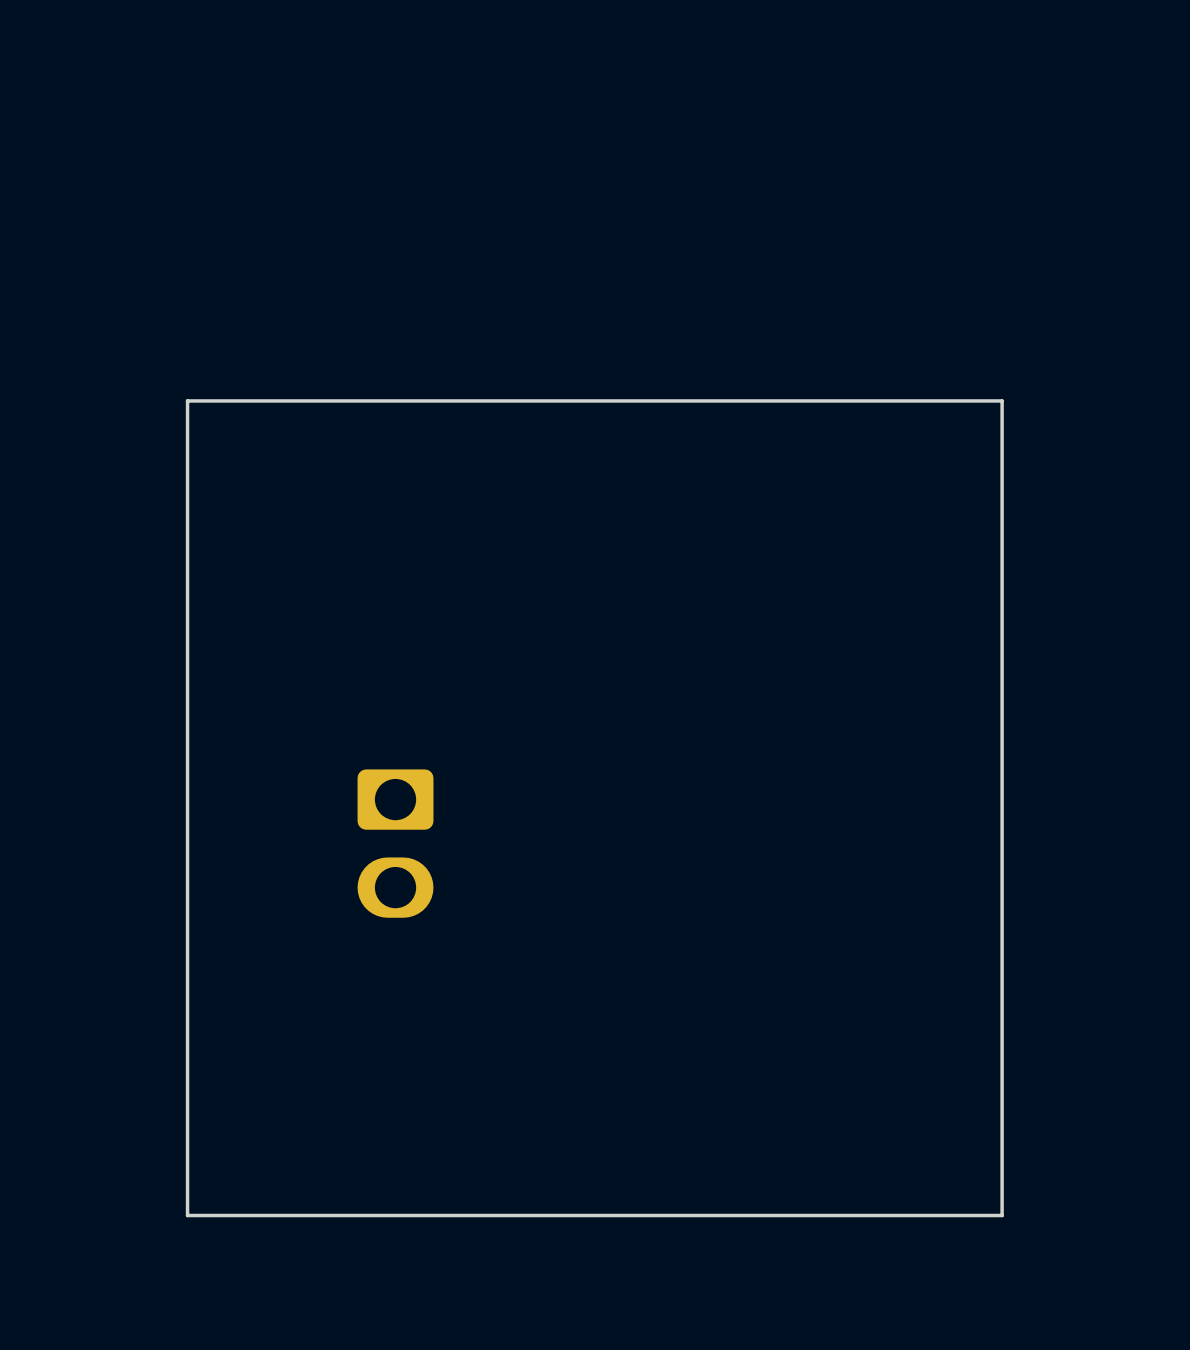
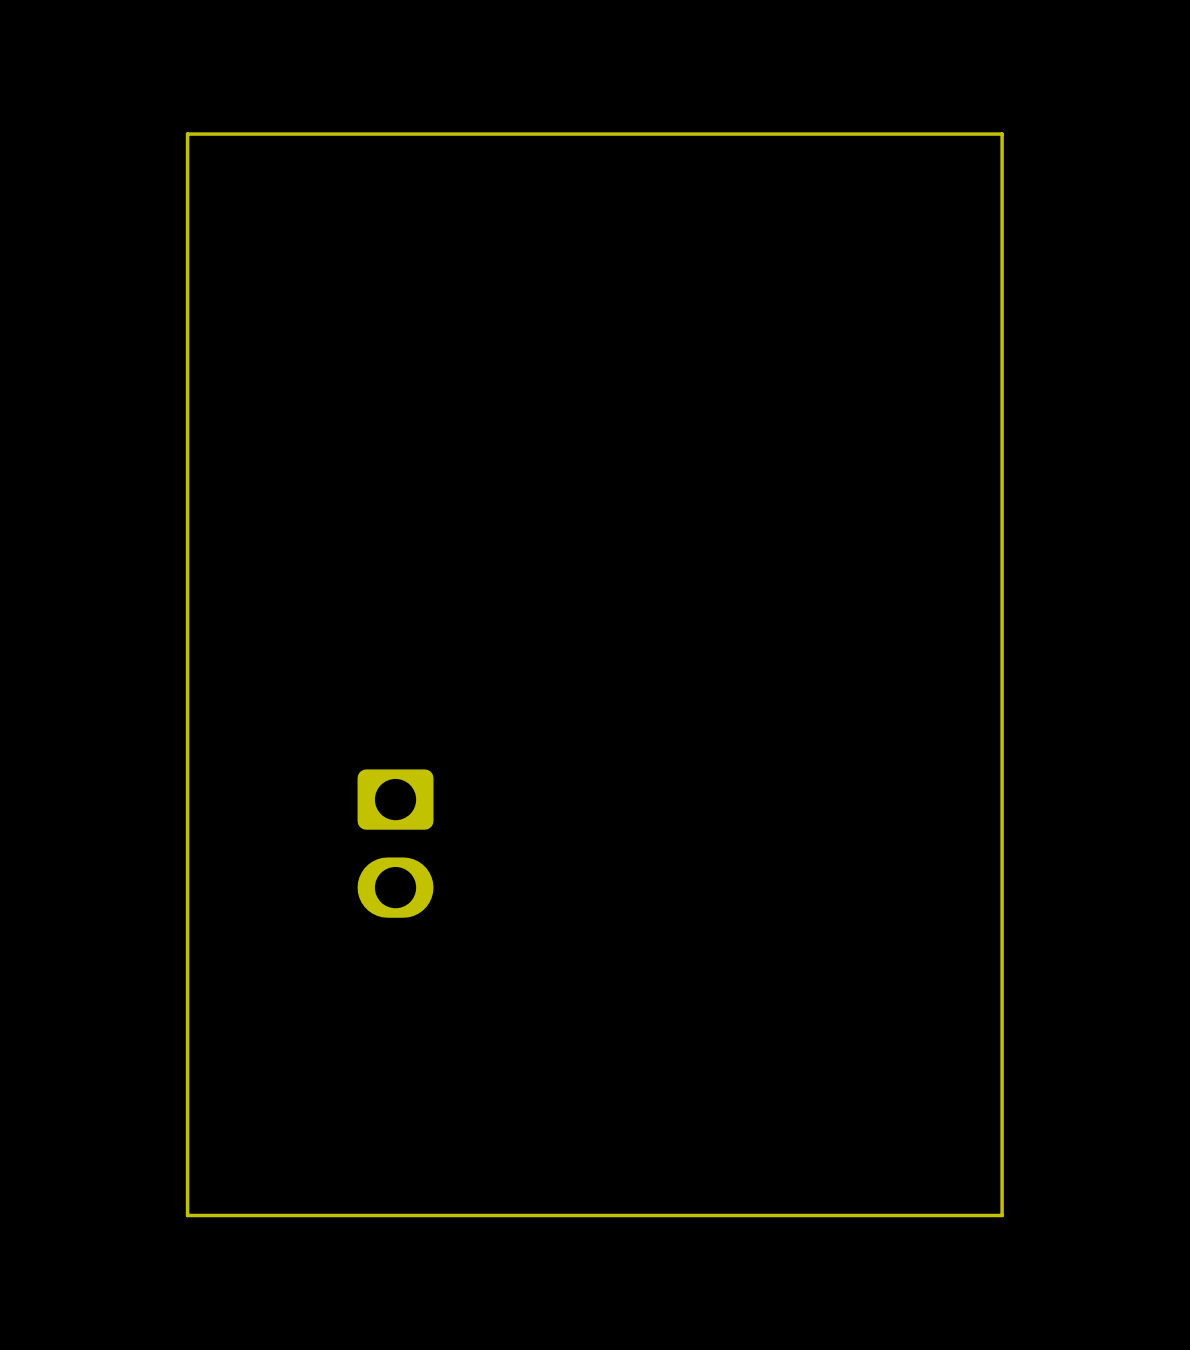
board edge: (1002, 400) (187, 400) -> (1002, 400) (1002, 134) (187, 134) (187, 400)

